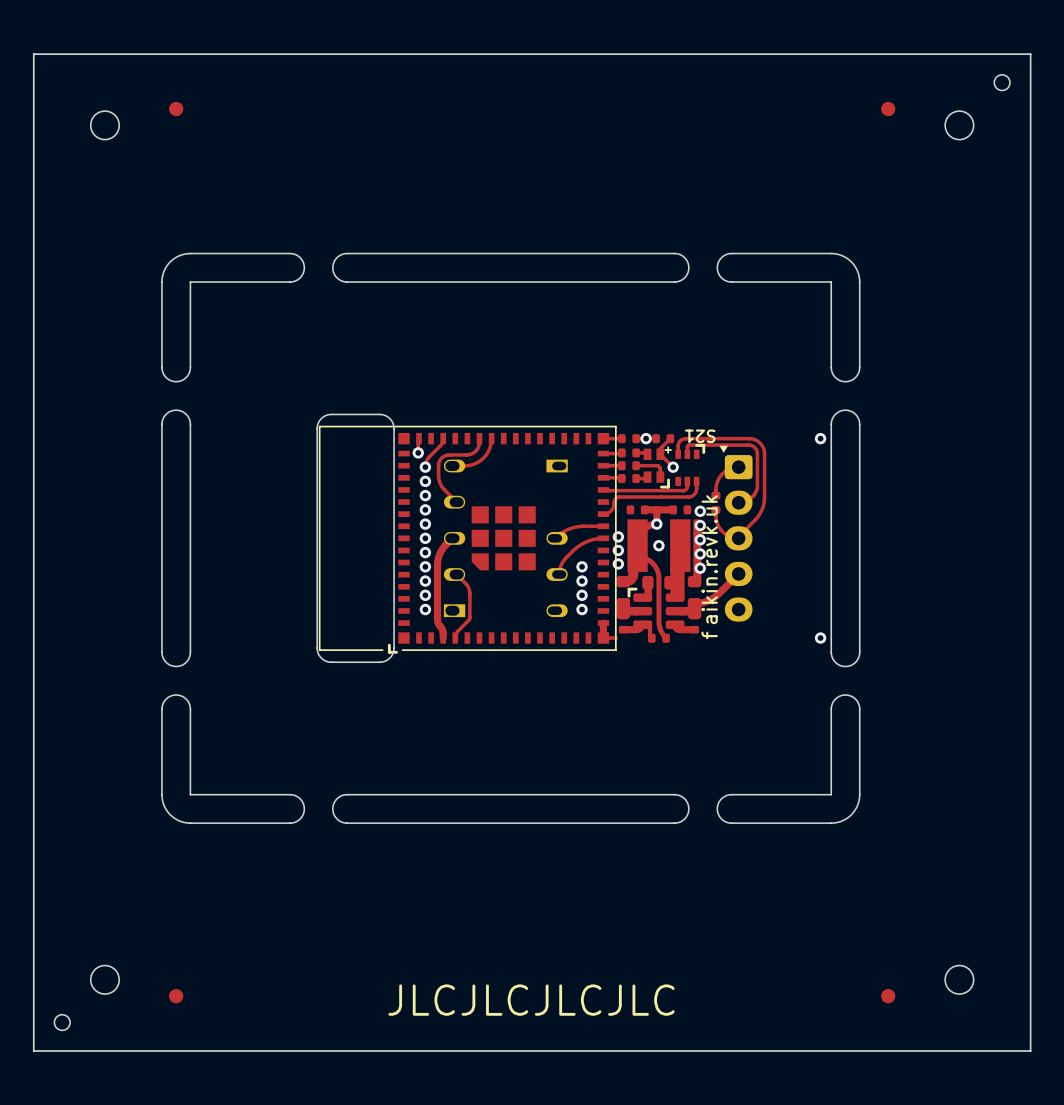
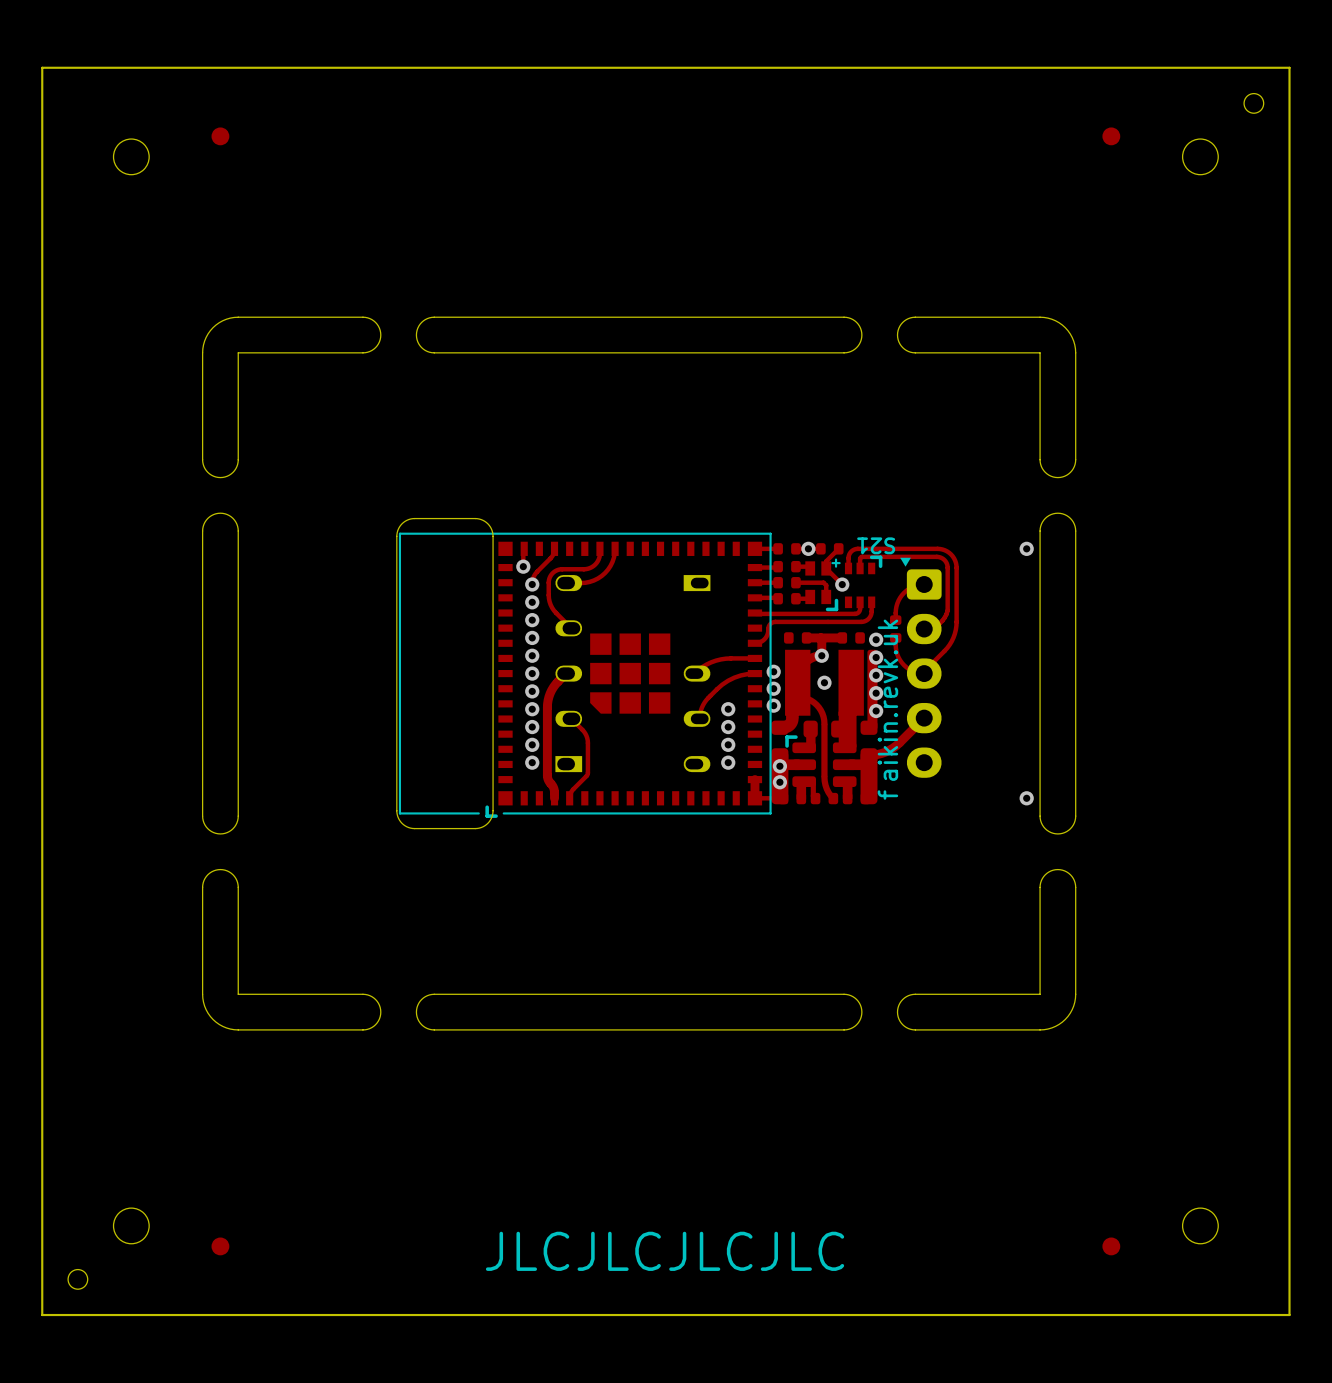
part footprint: [616, 519, 702, 643] -> [771, 649, 878, 805]
via: none -> (779, 766)
via: none -> (779, 782)

